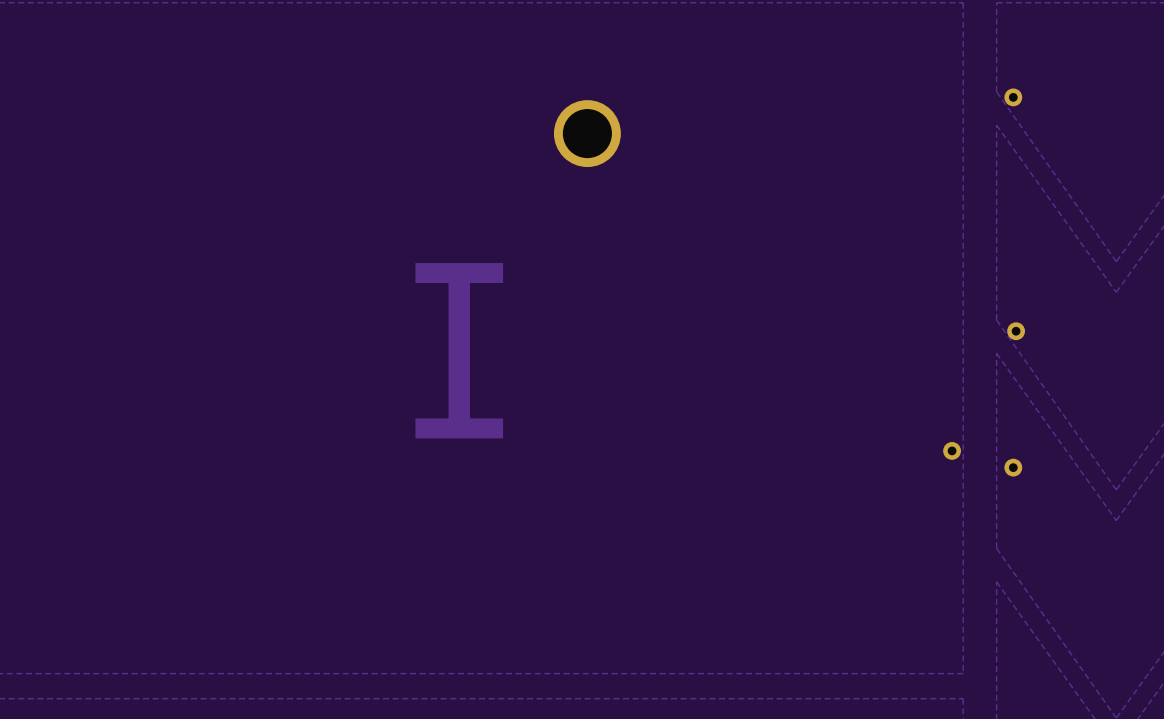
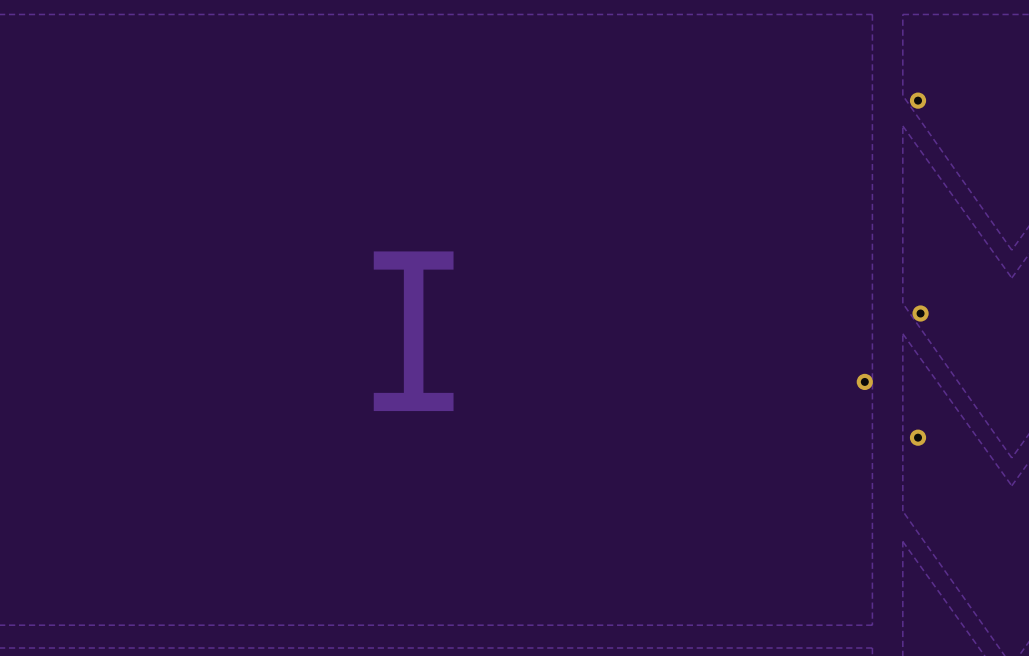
via: (587, 133) -> none
via position: (952, 450) -> (864, 381)

